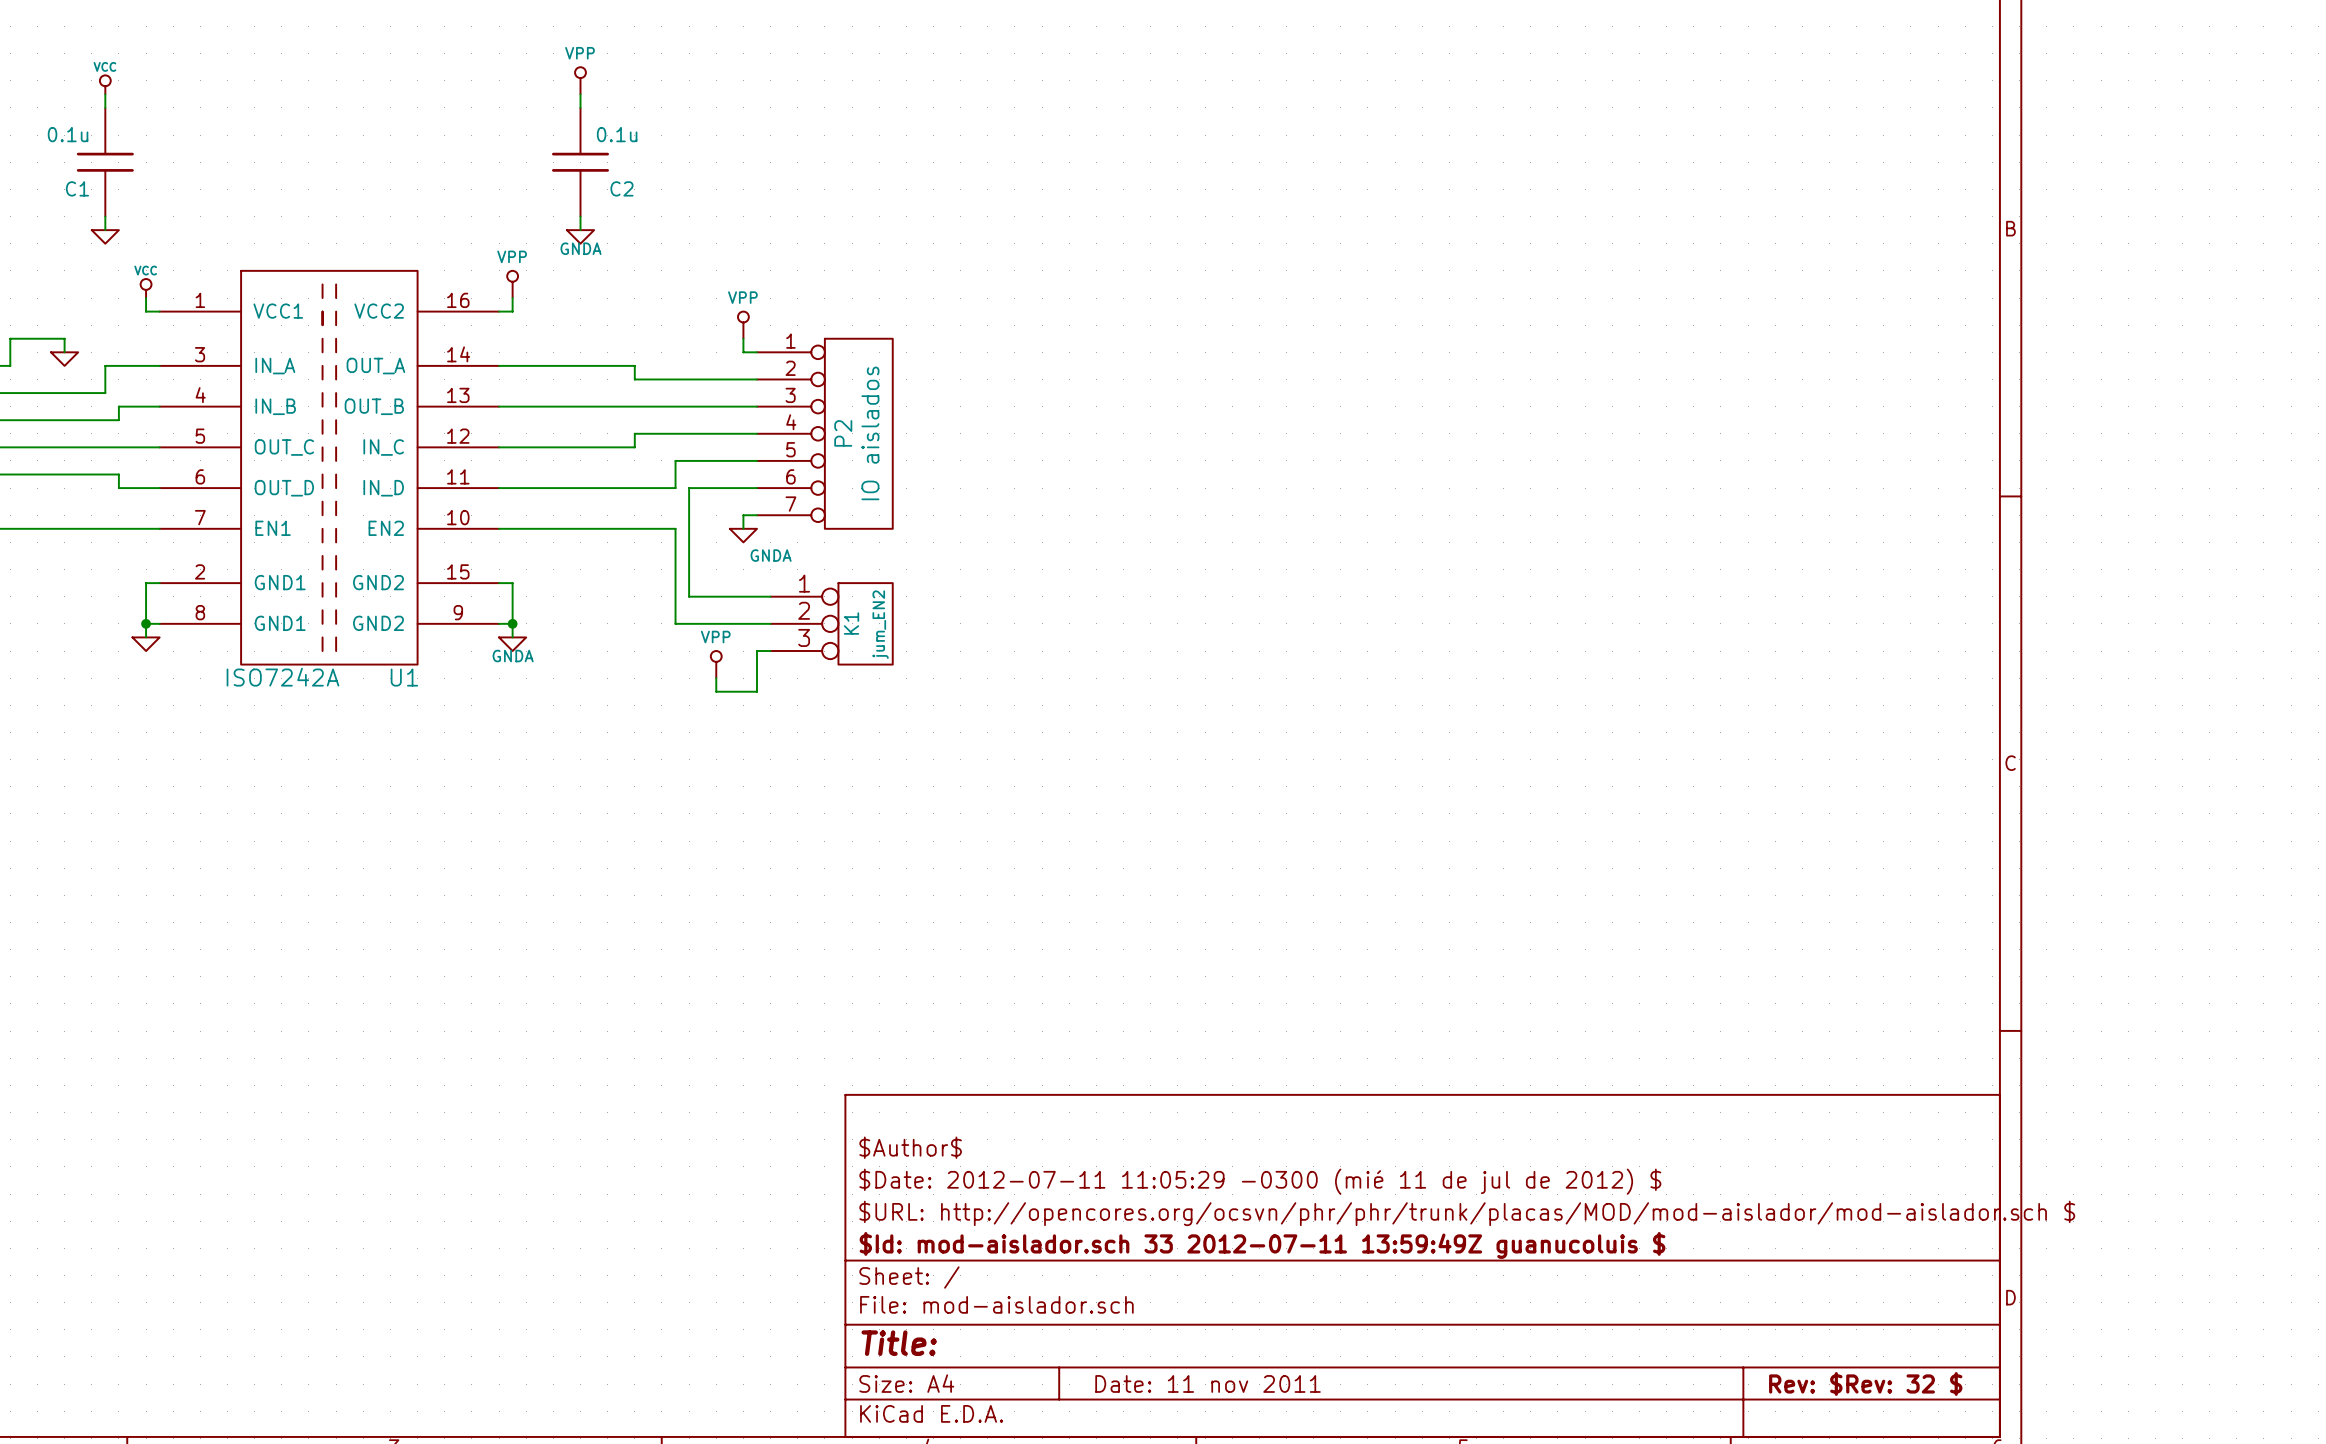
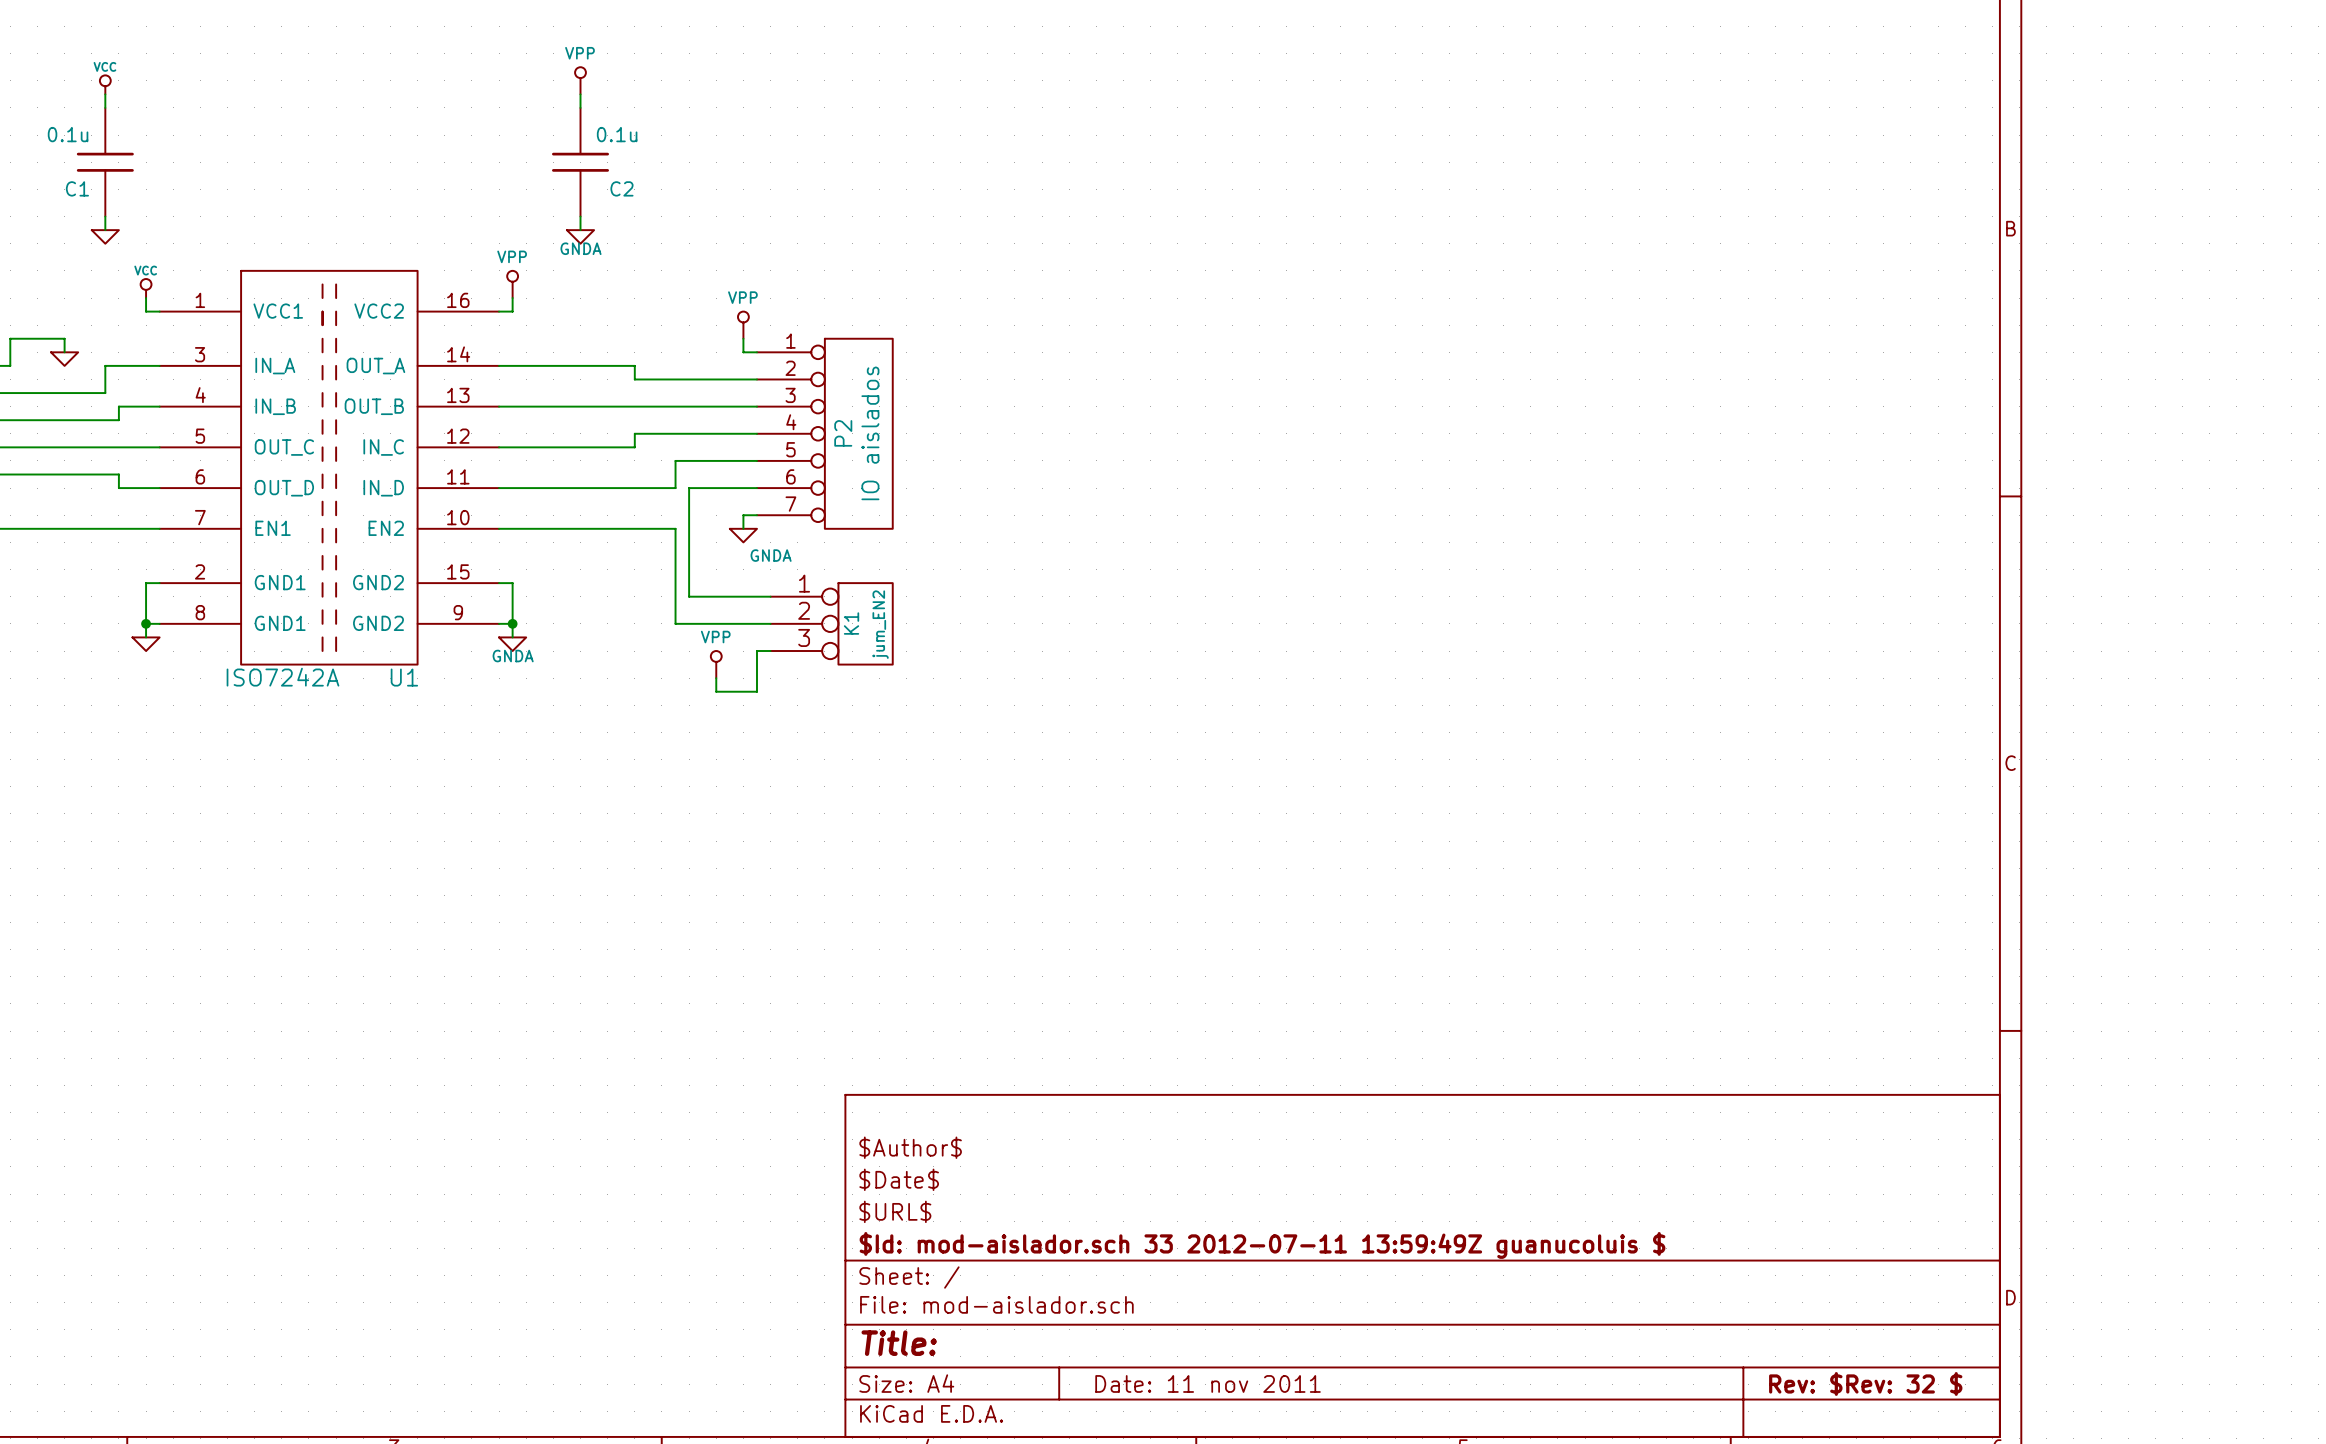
title block: $Date: 2012-07-11 11:05:29 -0300 (mié 11 de jul de 2012) $ (1260, 1181) -> $Date$ (899, 1179)
title block: $URL: http://opencores.org/ocsvn/phr/phr/trunk/placas/MOD/mod-aislador/mod-aislador.sch $ (1467, 1213) -> $URL$ (895, 1211)

